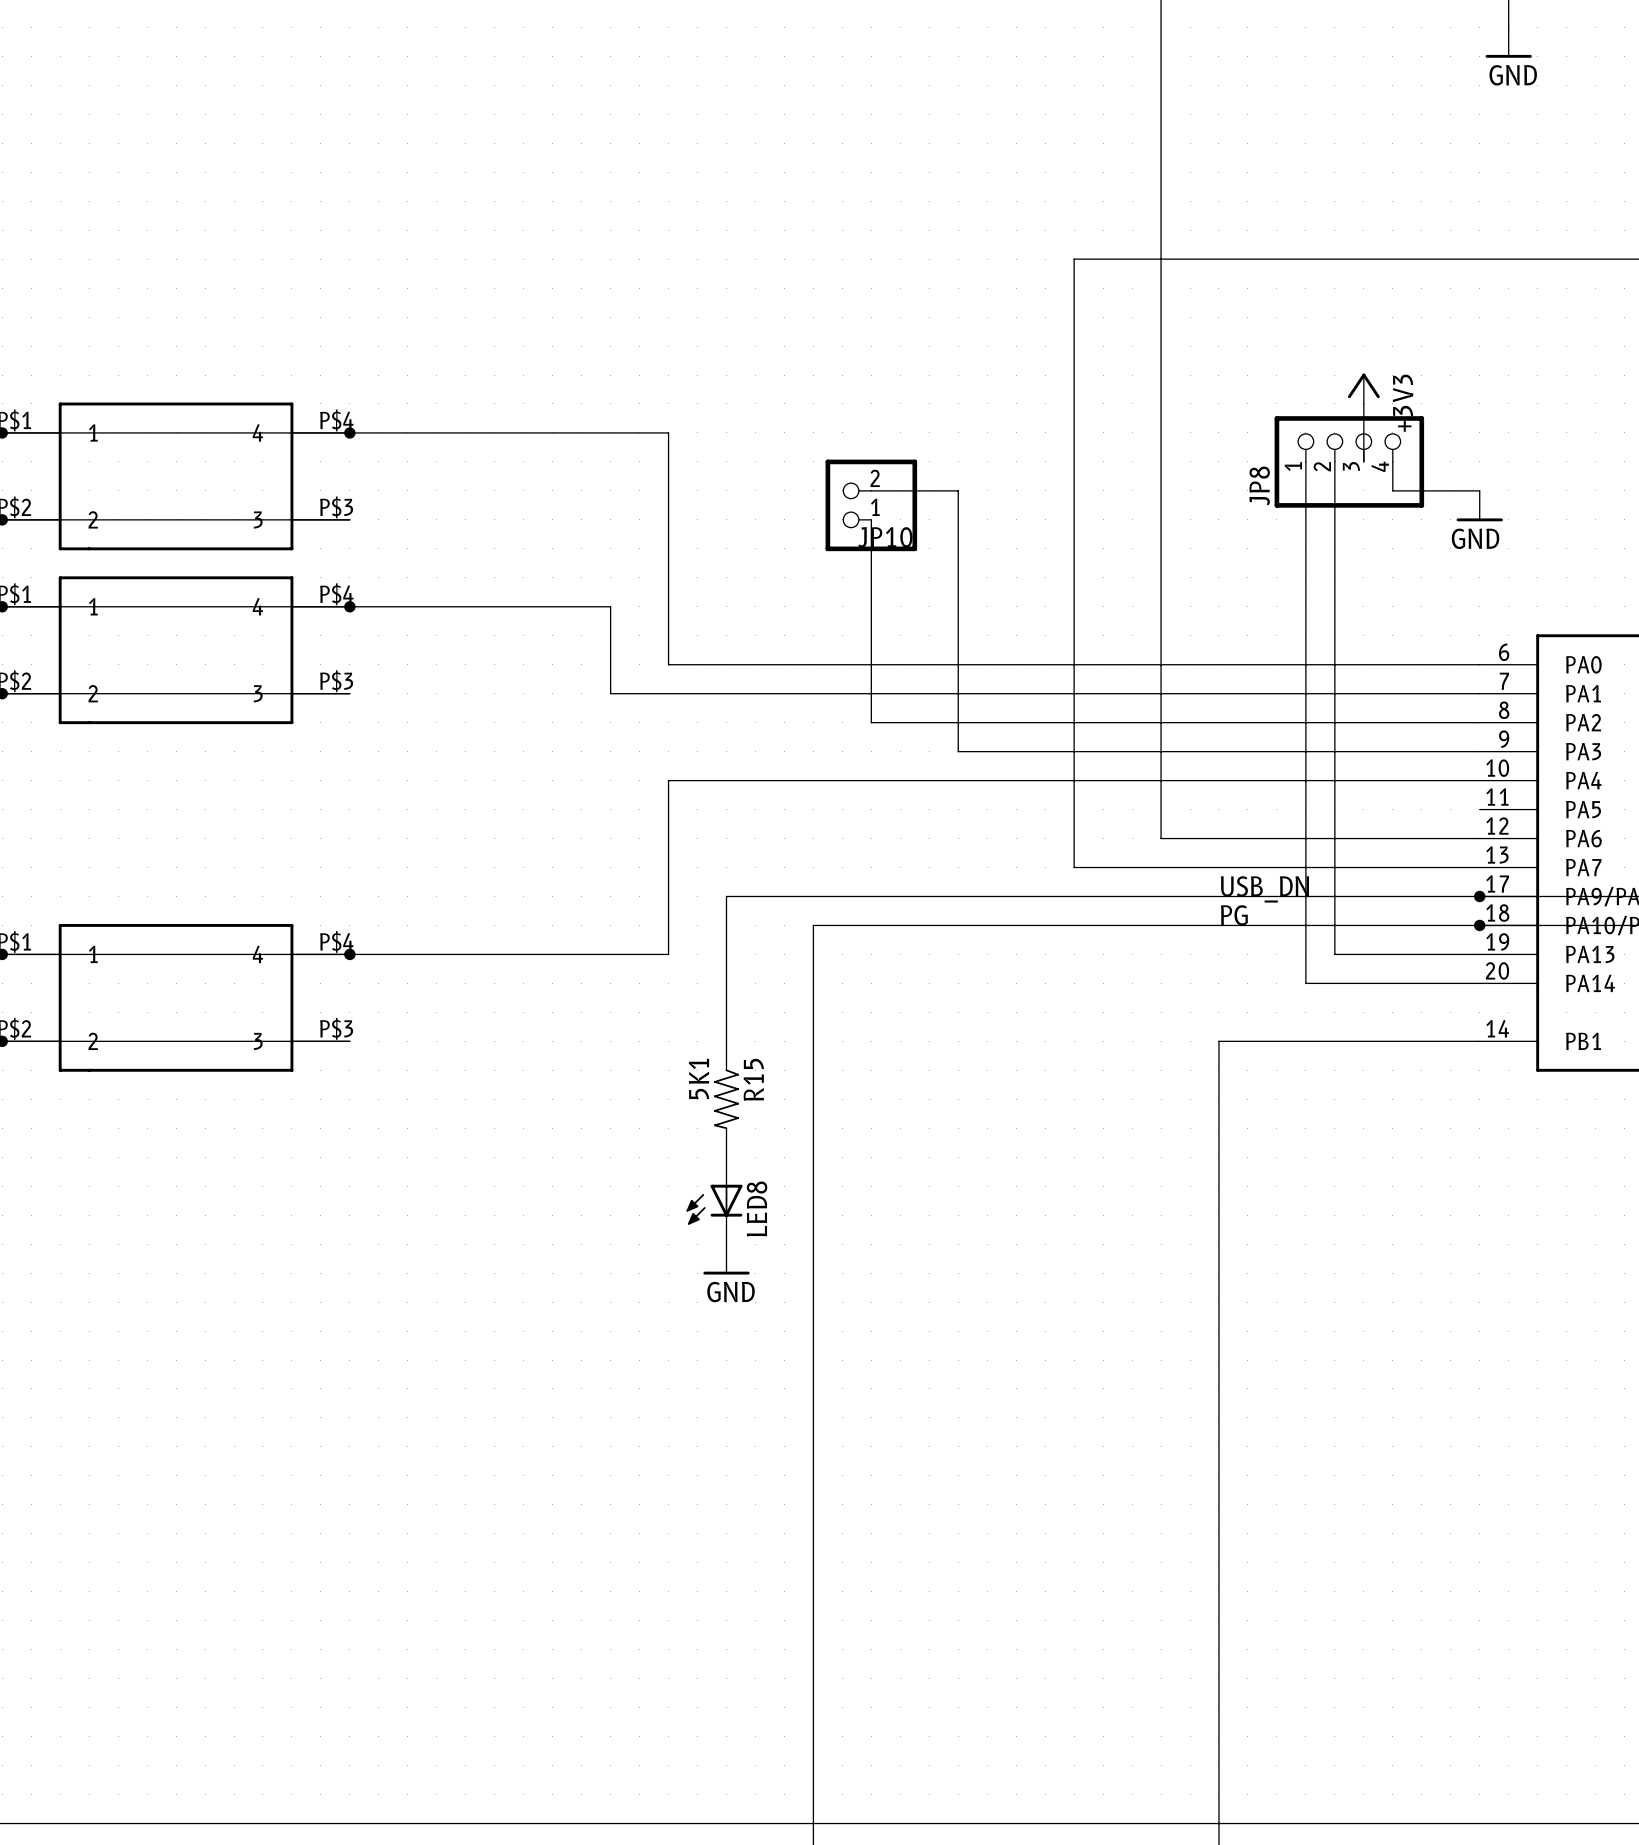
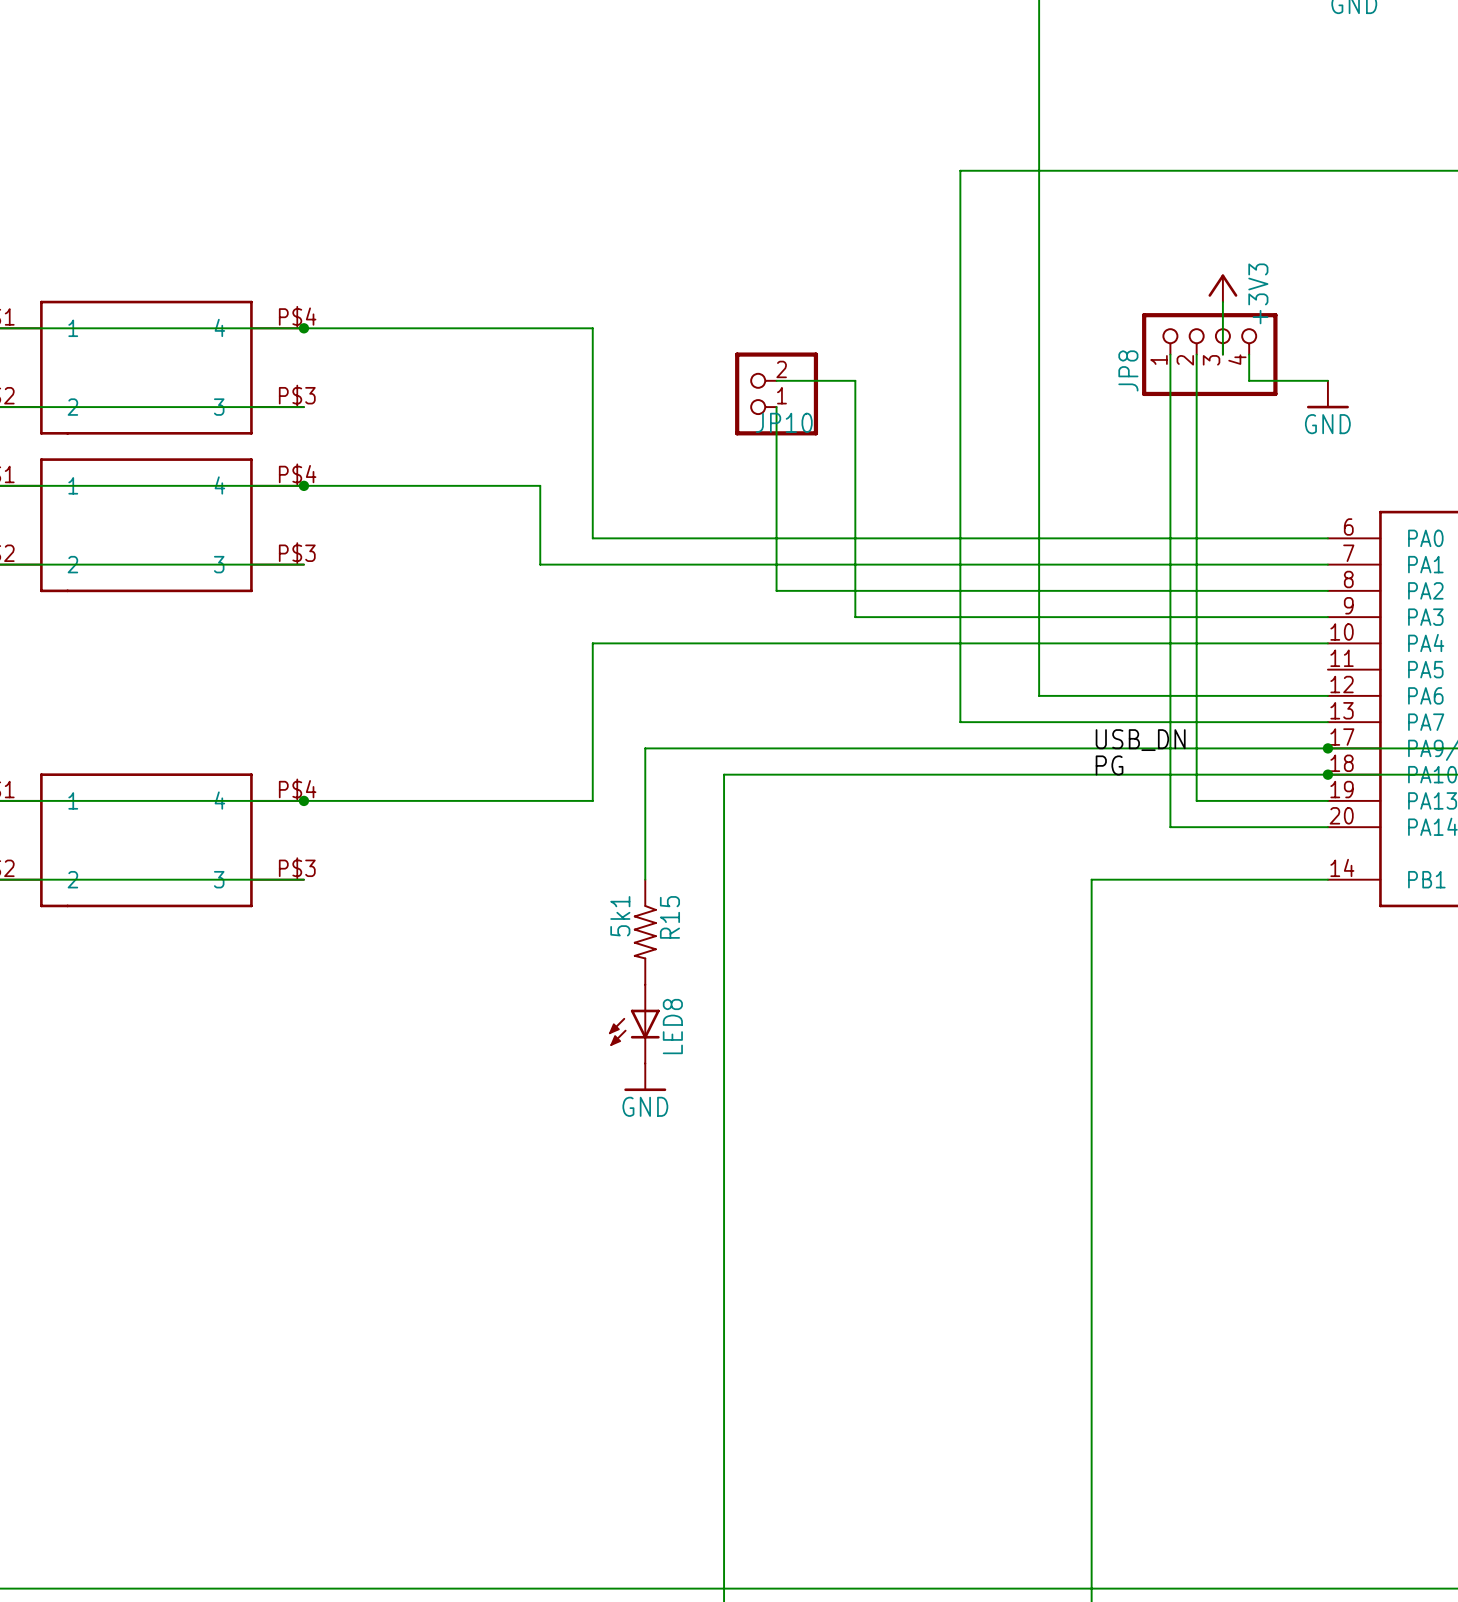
R15 value: 5K1 (698, 1078) -> 5k1 (620, 916)

